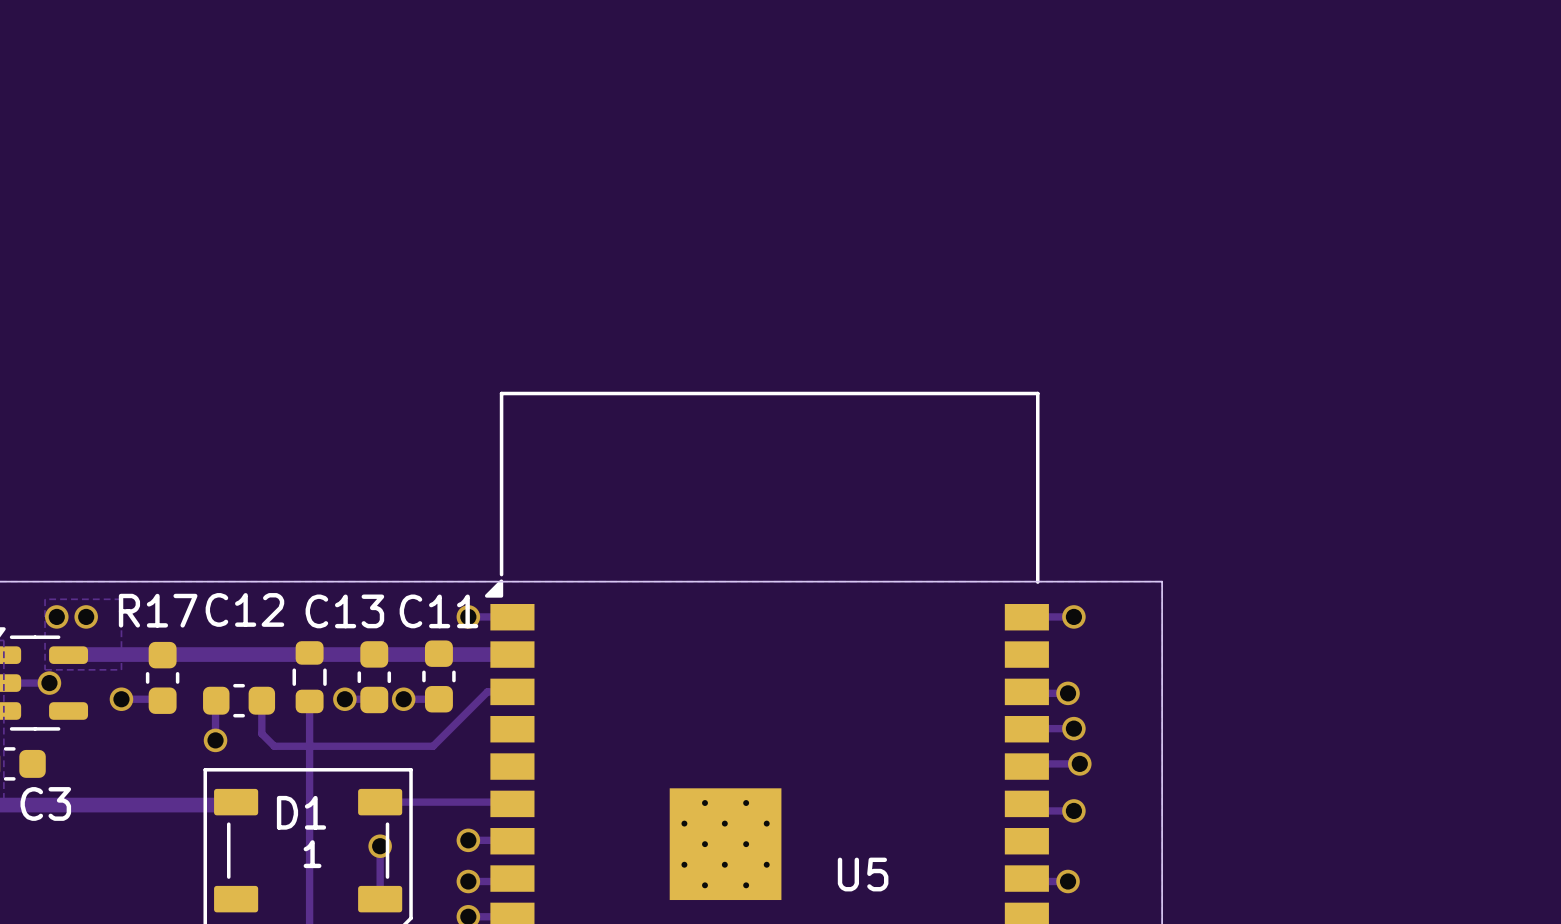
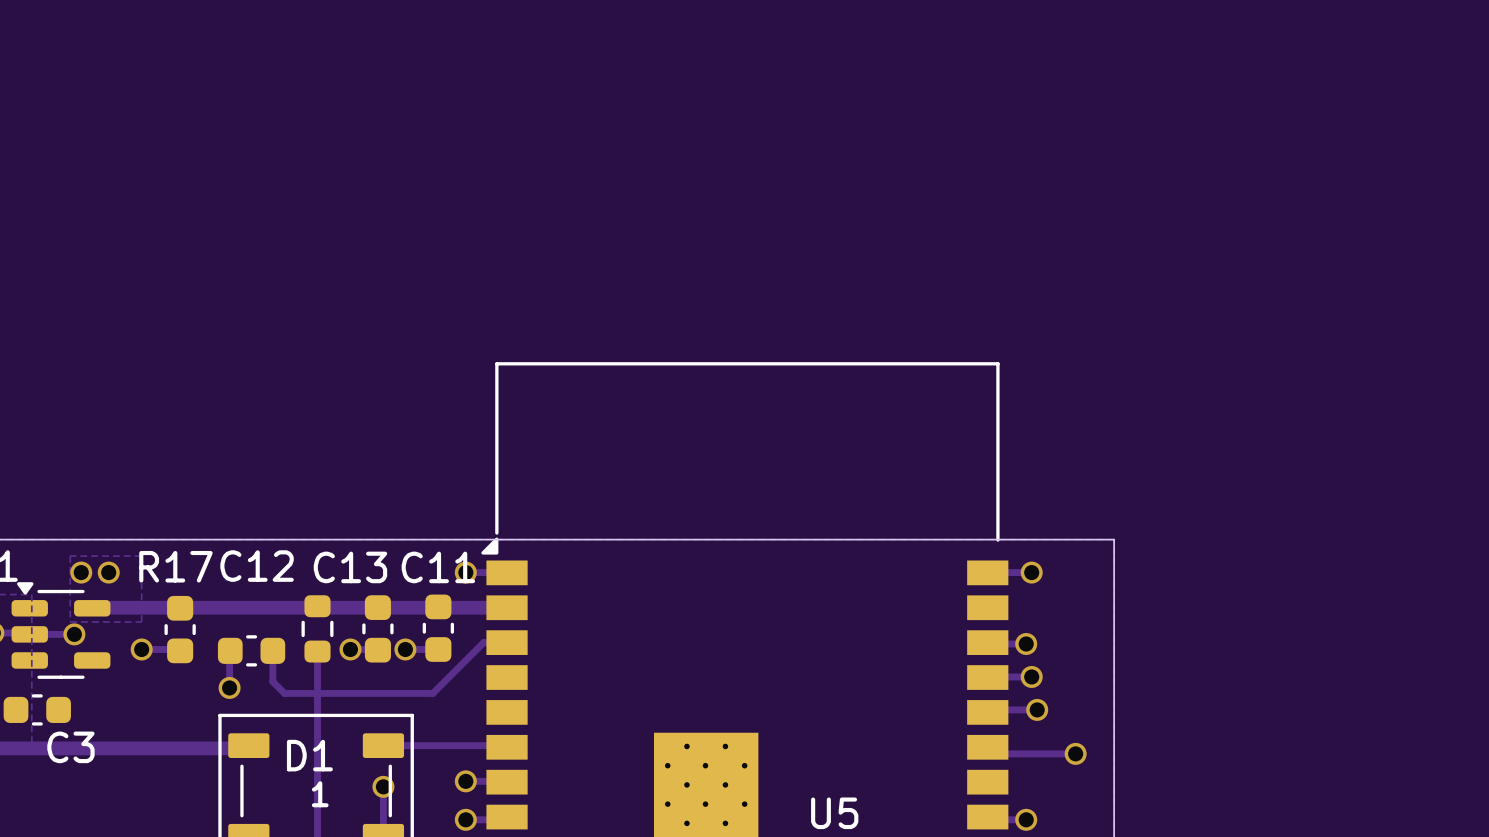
track: none -> (1031, 753) (1075, 753)
via position: (1073, 810) -> (1075, 753)

